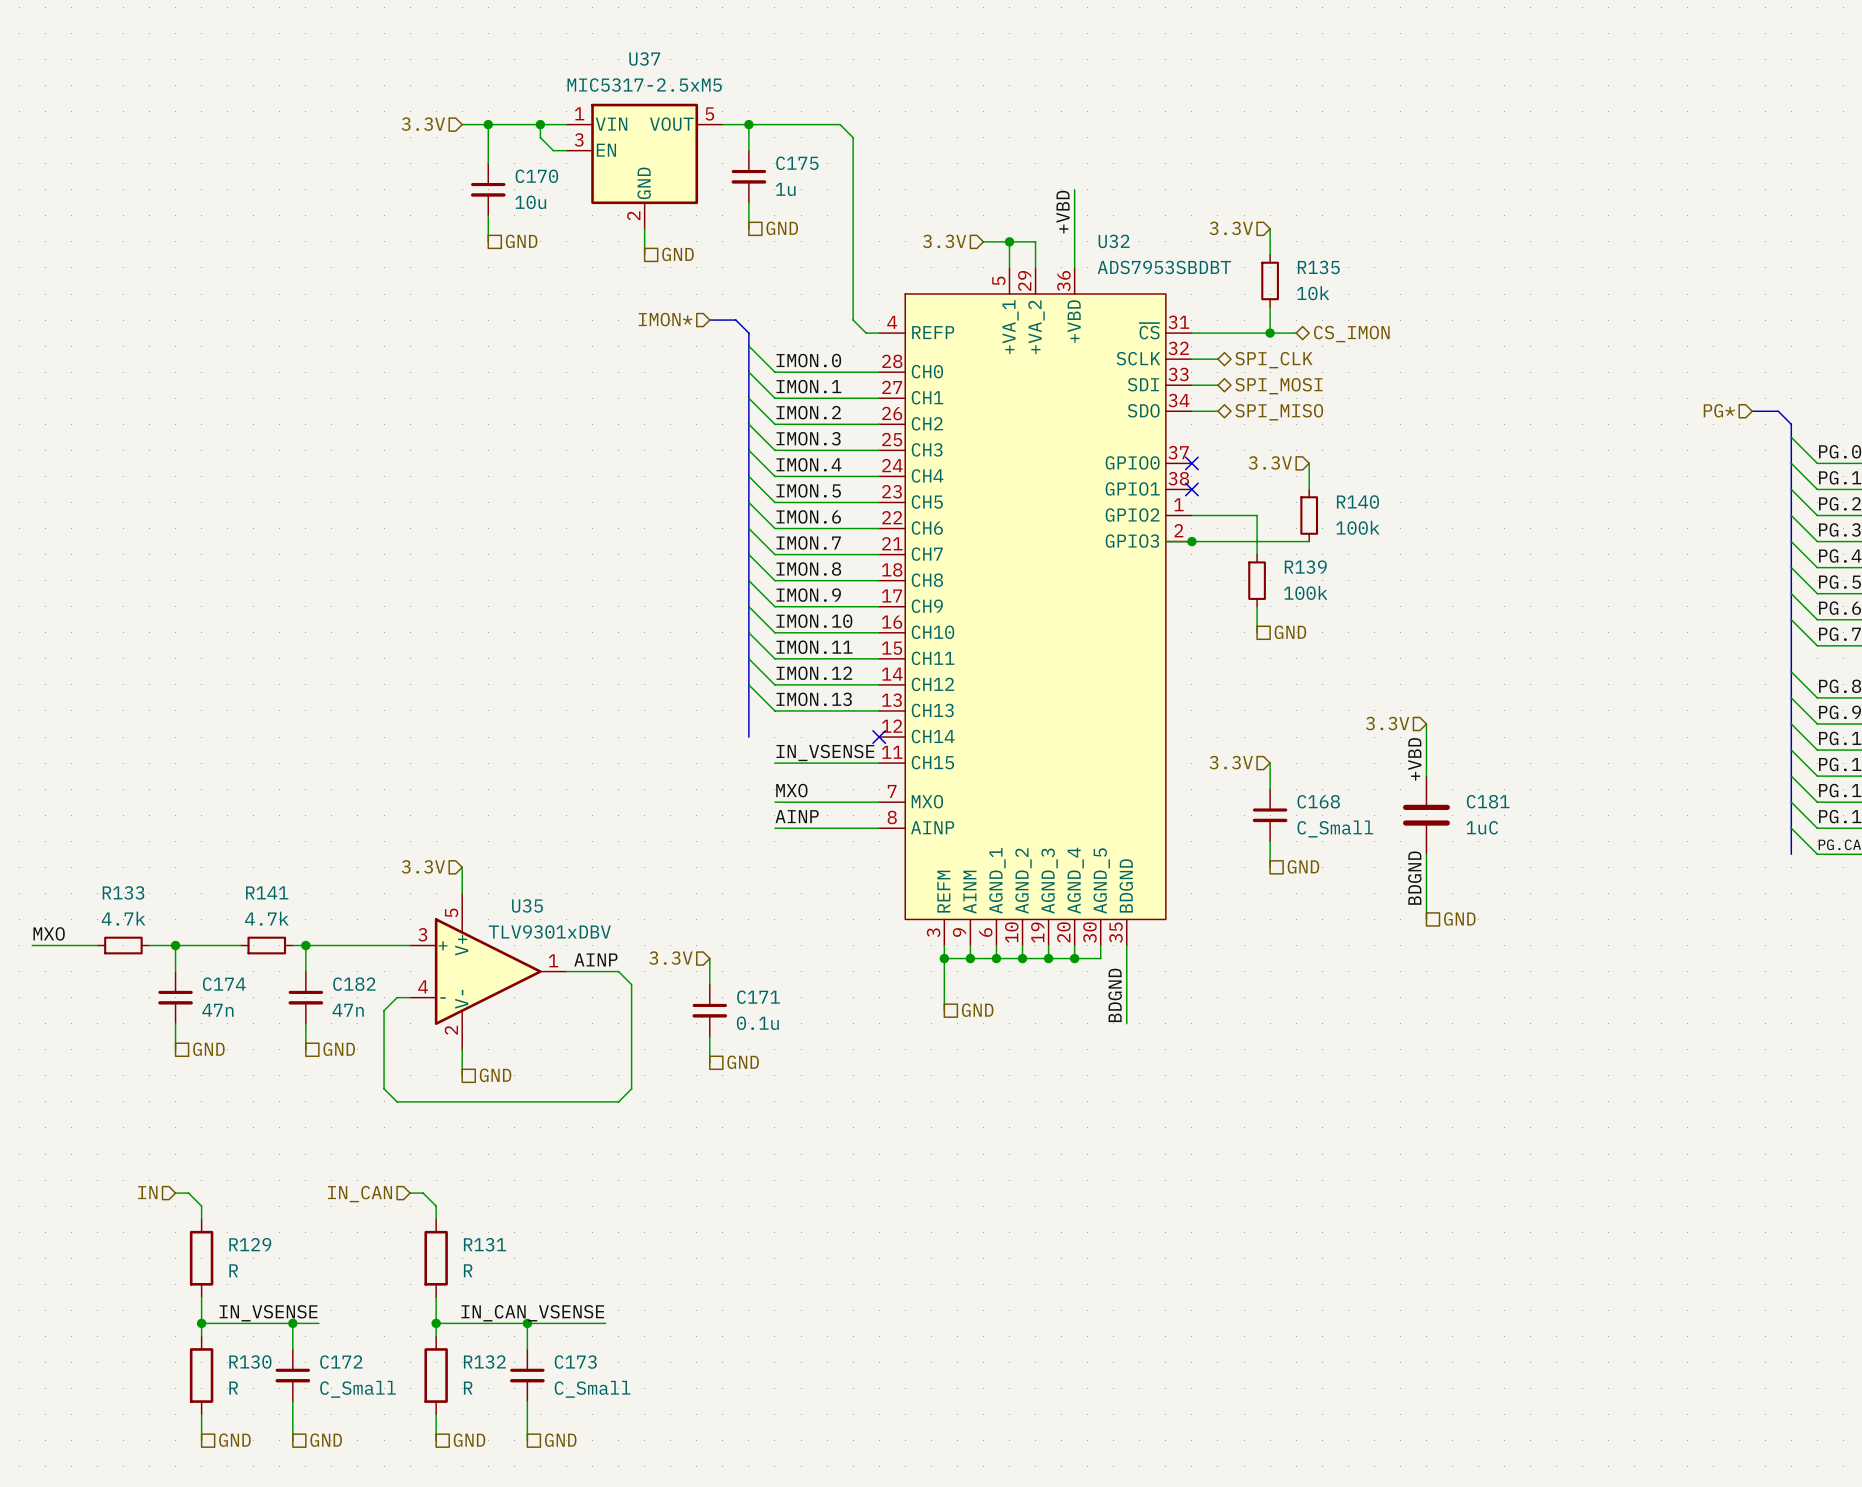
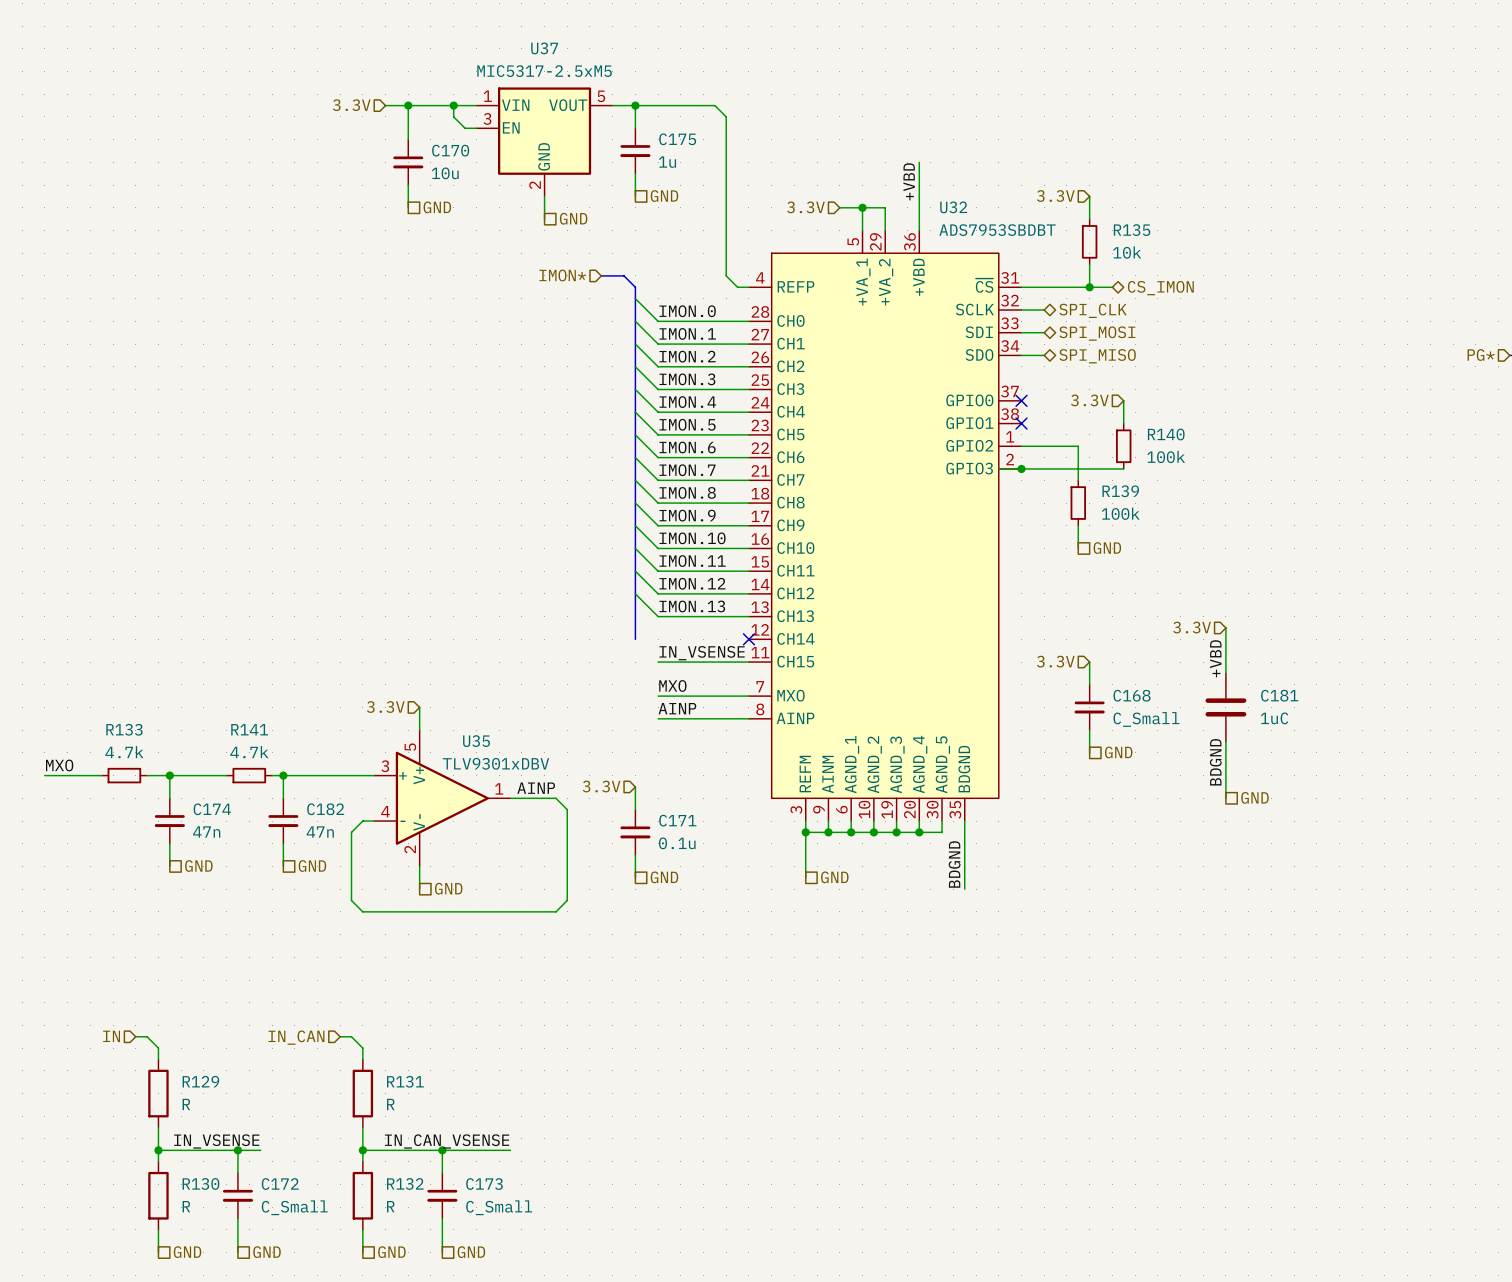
hierarchical label position: 3.3V (423, 866) -> 3.3V (385, 707)
wire: (462, 867) (462, 893) -> (419, 707) (419, 730)
junction: none -> (169, 775)
junction: none -> (283, 775)
label position: MXO (49, 933) -> MXO (59, 765)
wire: (32, 945) (97, 945) -> (44, 775) (101, 775)
R133 position: (123, 945) -> (124, 775)
wire: (149, 945) (240, 945) -> (147, 775) (226, 775)
wire: (175, 945) (175, 971) -> (169, 775) (169, 798)
junction: (175, 945) -> none
R141 position: (266, 945) -> (249, 775)
wire: (292, 945) (410, 945) -> (272, 775) (374, 775)
wire: (305, 945) (305, 971) -> (283, 775) (283, 798)
junction: (305, 945) -> none
hierarchical label position: 3.3V (670, 958) -> 3.3V (601, 786)
wire: (709, 958) (709, 984) -> (635, 786) (635, 809)
label position: AINP (595, 959) -> AINP (536, 788)
U35 position: (488, 971) -> (442, 798)
wire: (566, 971) (618, 971) (631, 984) (631, 1088) (618, 1101) (397, 1101) (384, 1088) (384, 1010) (397, 997) (410, 997) -> (510, 798) (555, 798) (567, 809) (567, 900) (555, 911) (362, 911) (351, 900) (351, 832) (362, 821) (374, 821)
C174 position: (175, 997) -> (169, 821)
hierarchical label: none -> GND (198, 866)
C182 position: (305, 997) -> (283, 821)
hierarchical label: none -> GND (312, 866)
C171 position: (709, 1010) -> (635, 832)
wire: (175, 1023) (175, 1049) -> (169, 843) (169, 866)
wire: (305, 1023) (305, 1049) -> (283, 843) (283, 866)
wire: (709, 1036) (709, 1062) -> (635, 855) (635, 877)
hierarchical label: GND (208, 1049) -> none
hierarchical label: GND (339, 1049) -> none
wire: (462, 1049) (462, 1075) -> (419, 866) (419, 889)
hierarchical label position: GND (743, 1062) -> GND (664, 877)
hierarchical label position: GND (495, 1075) -> GND (448, 888)

